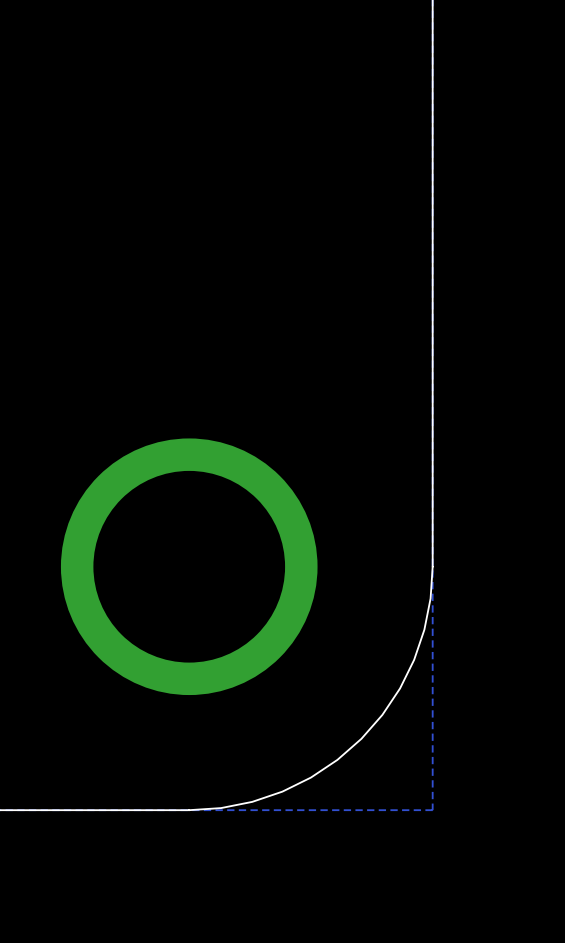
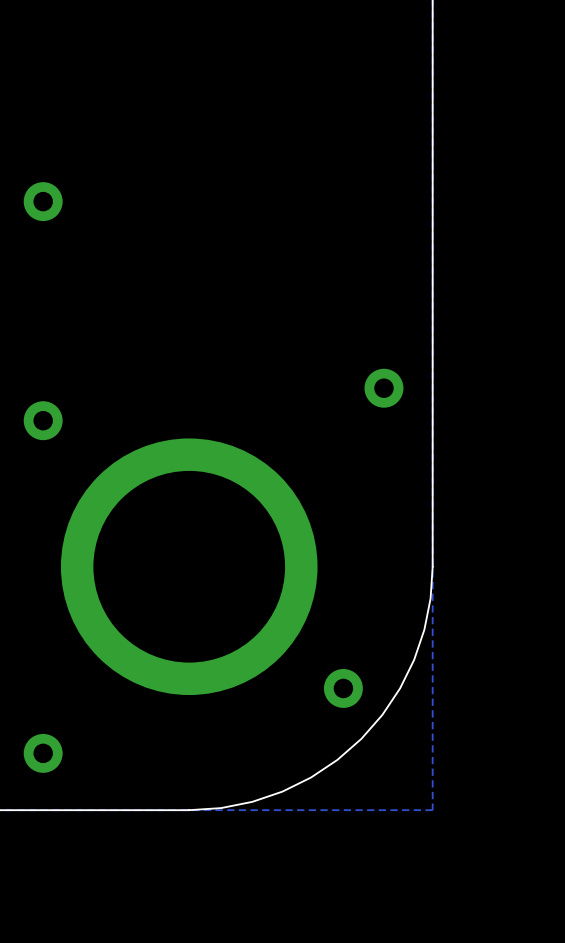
via: none -> (43, 201)
via: none -> (383, 388)
via: none -> (43, 420)
via: none -> (343, 688)
via: none -> (43, 753)

